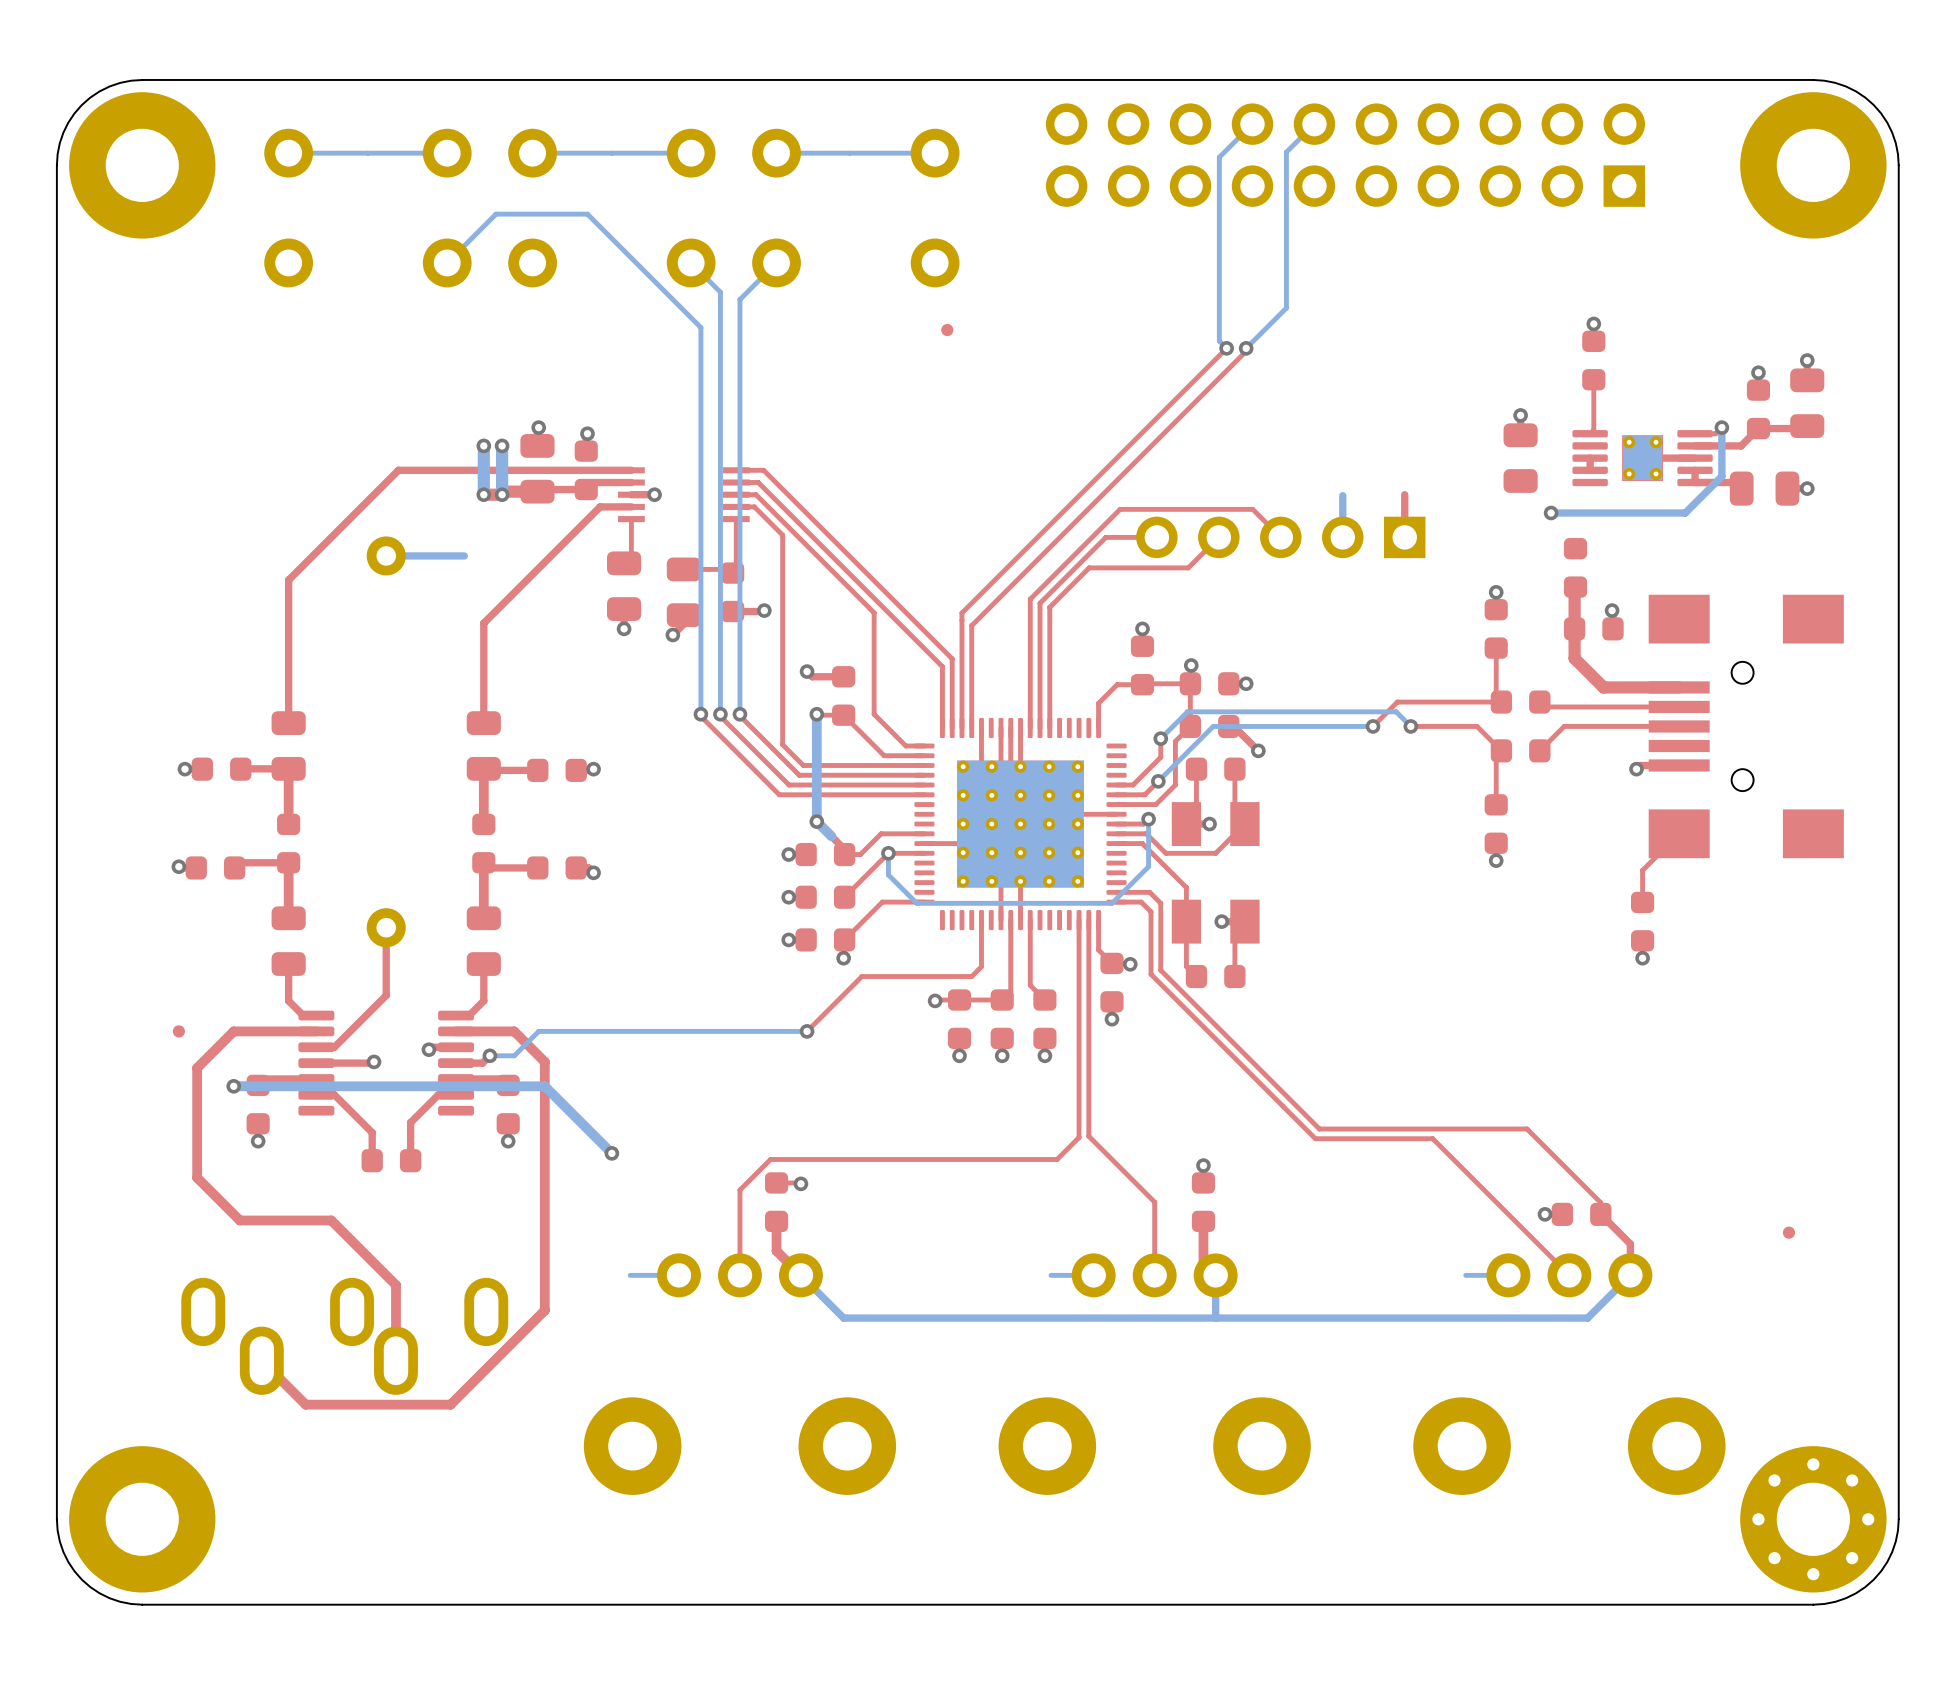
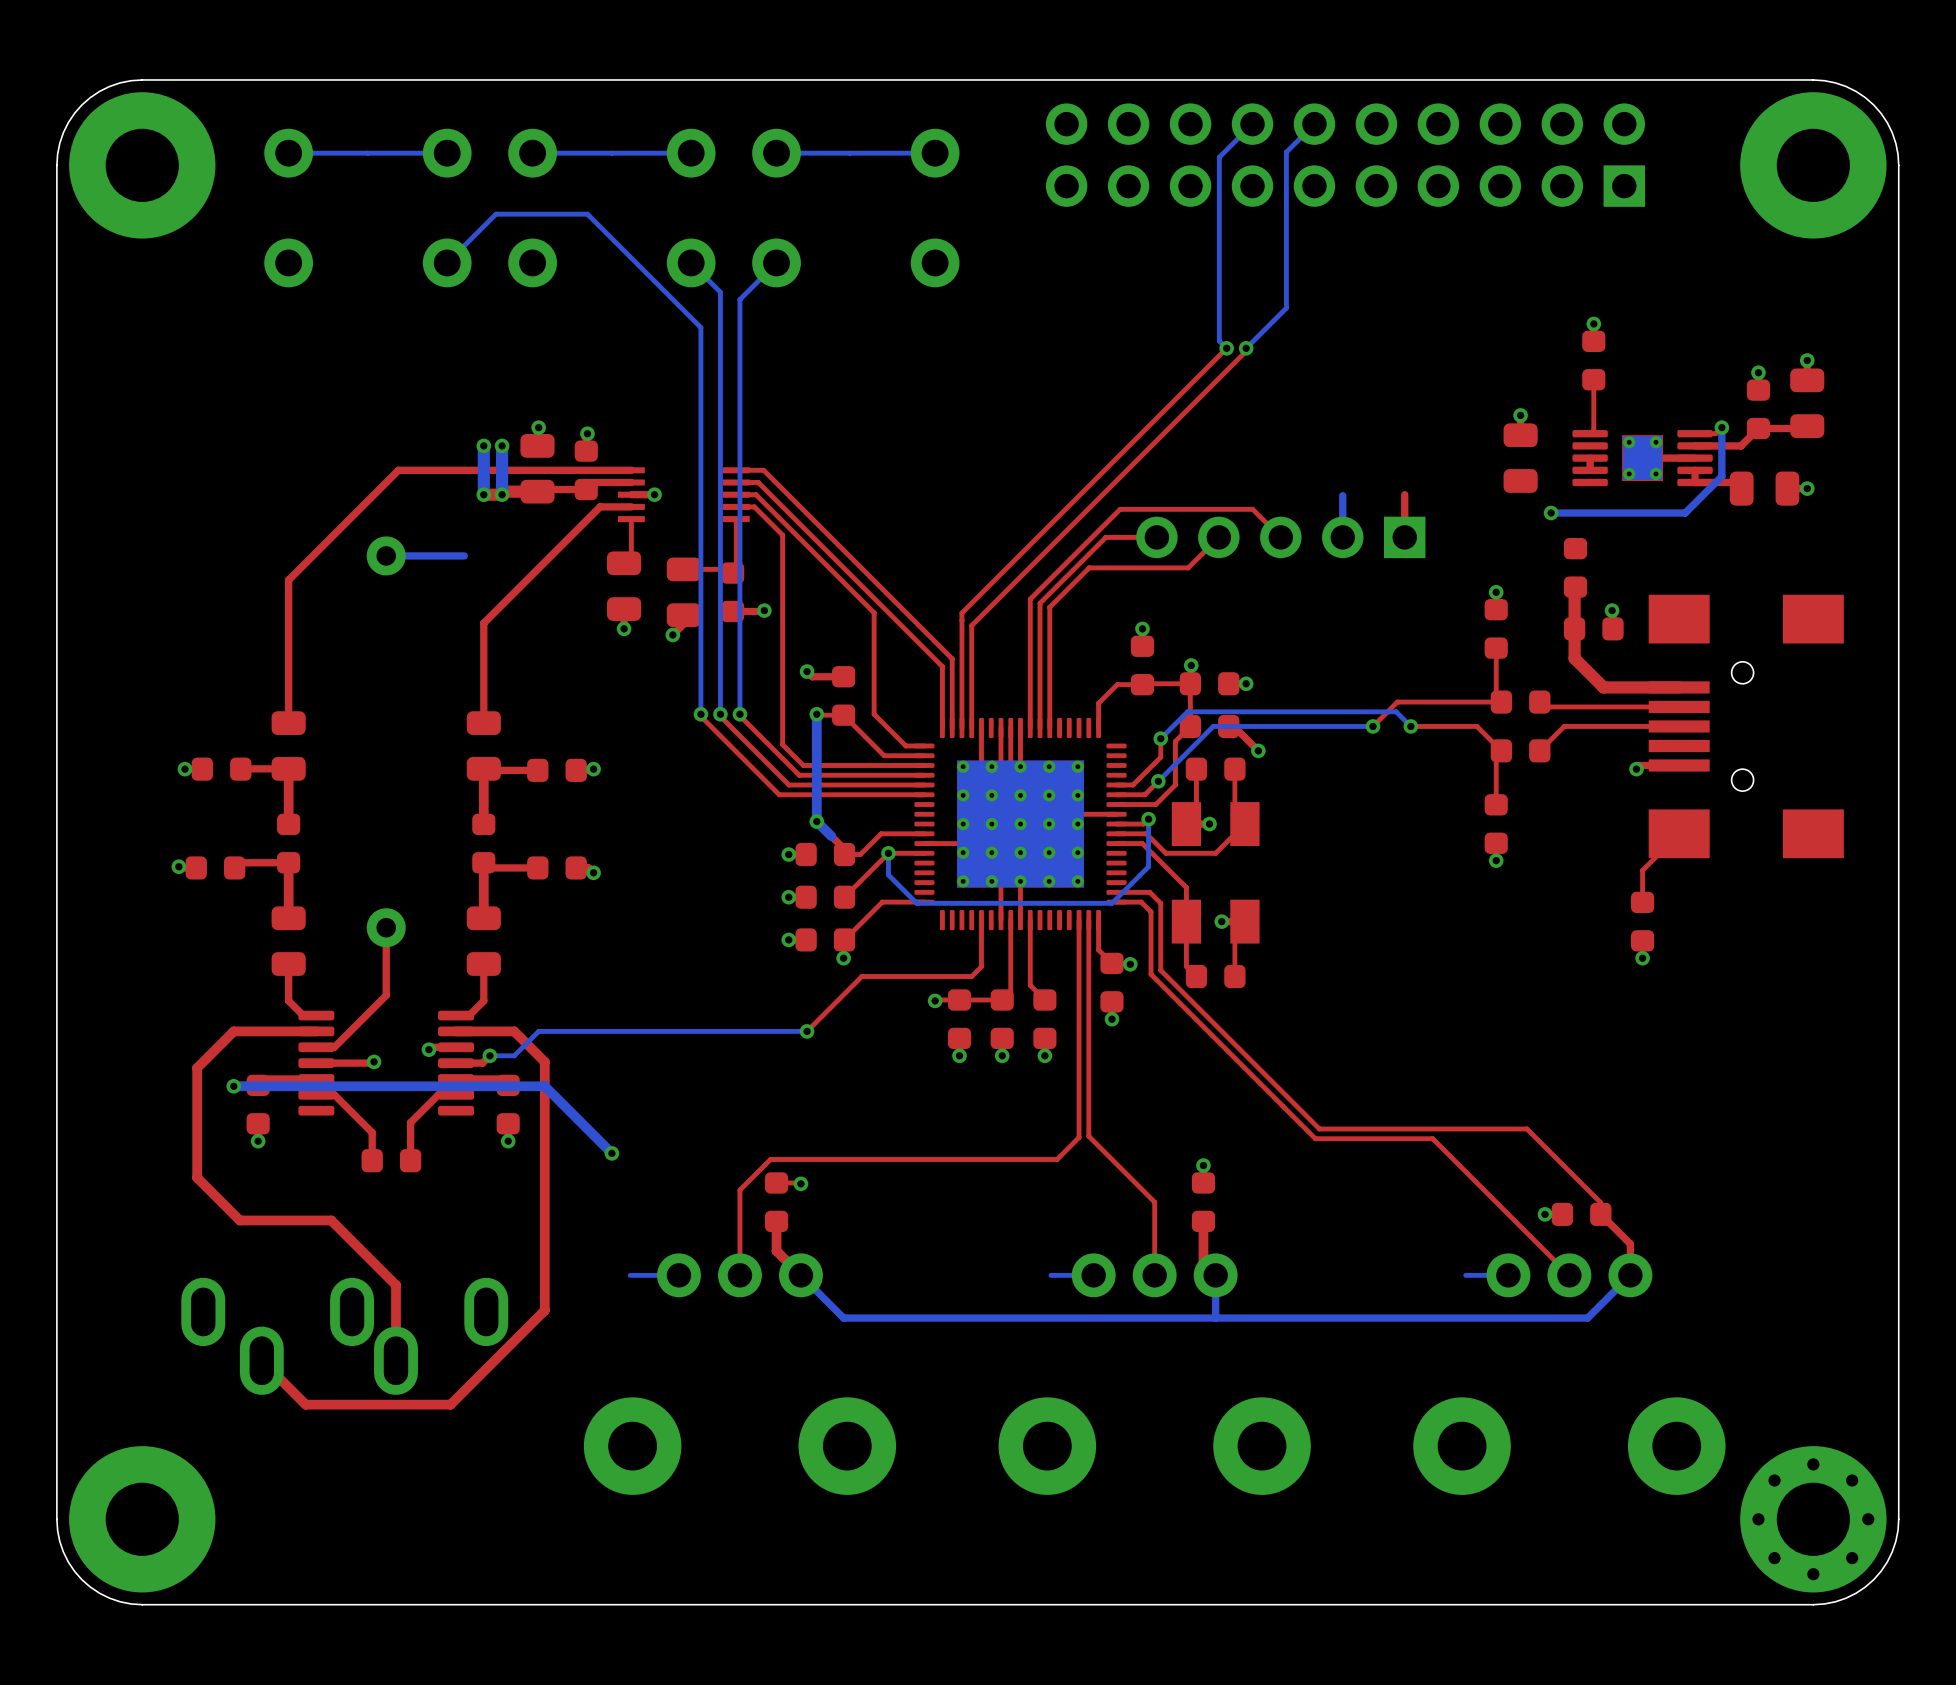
part: (947, 330) -> none
part: (178, 1031) -> none
part: (1788, 1232) -> none

